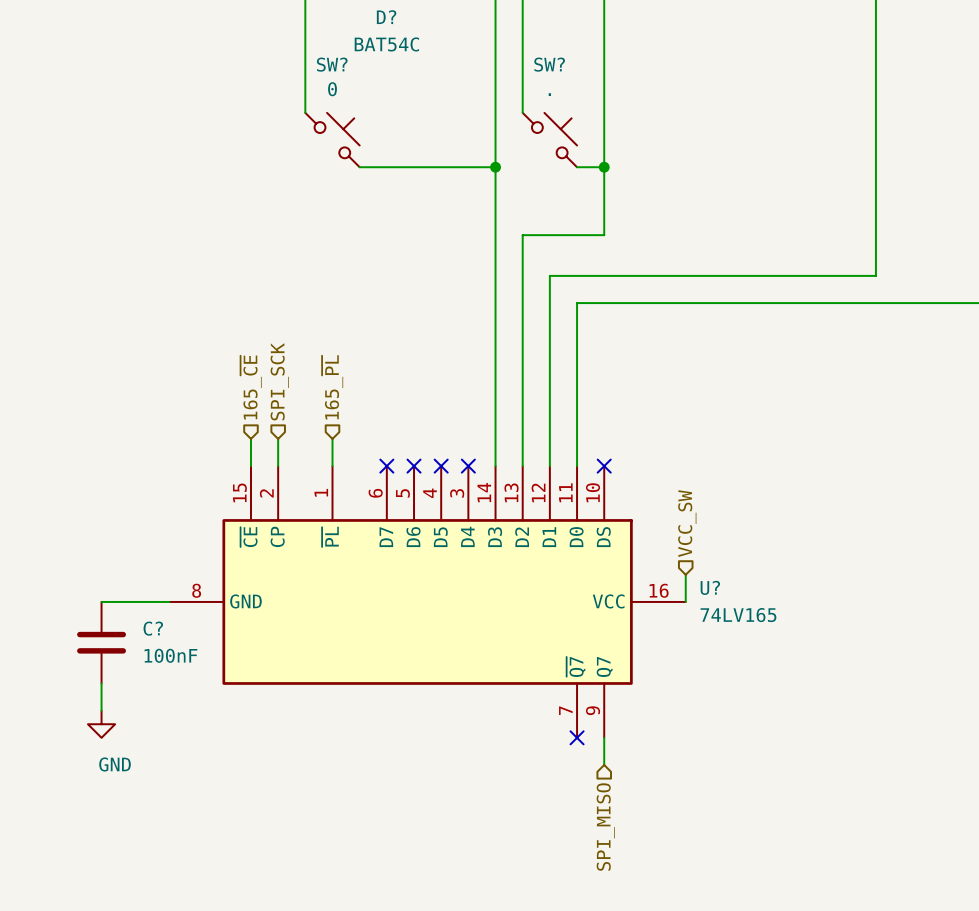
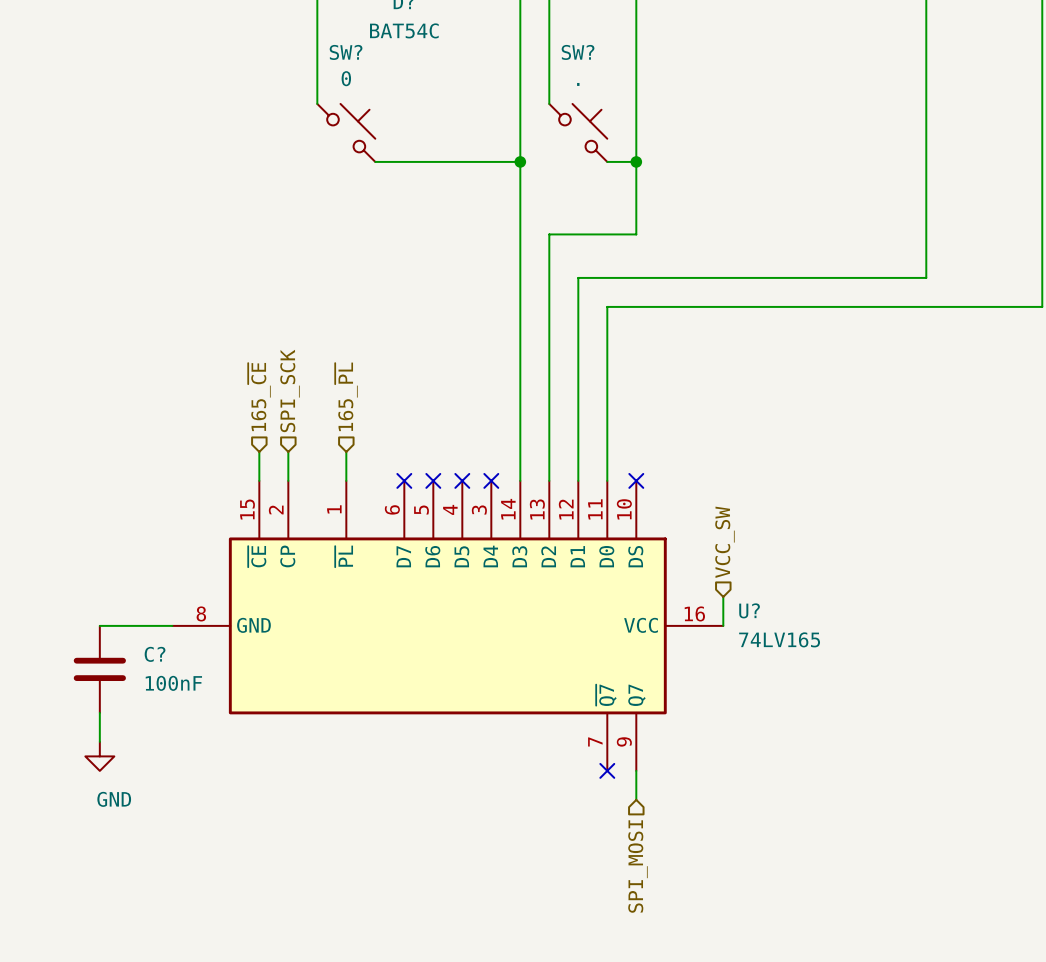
hierarchical label: SPI_MISO (605, 827) -> SPI_MOSI (637, 866)

